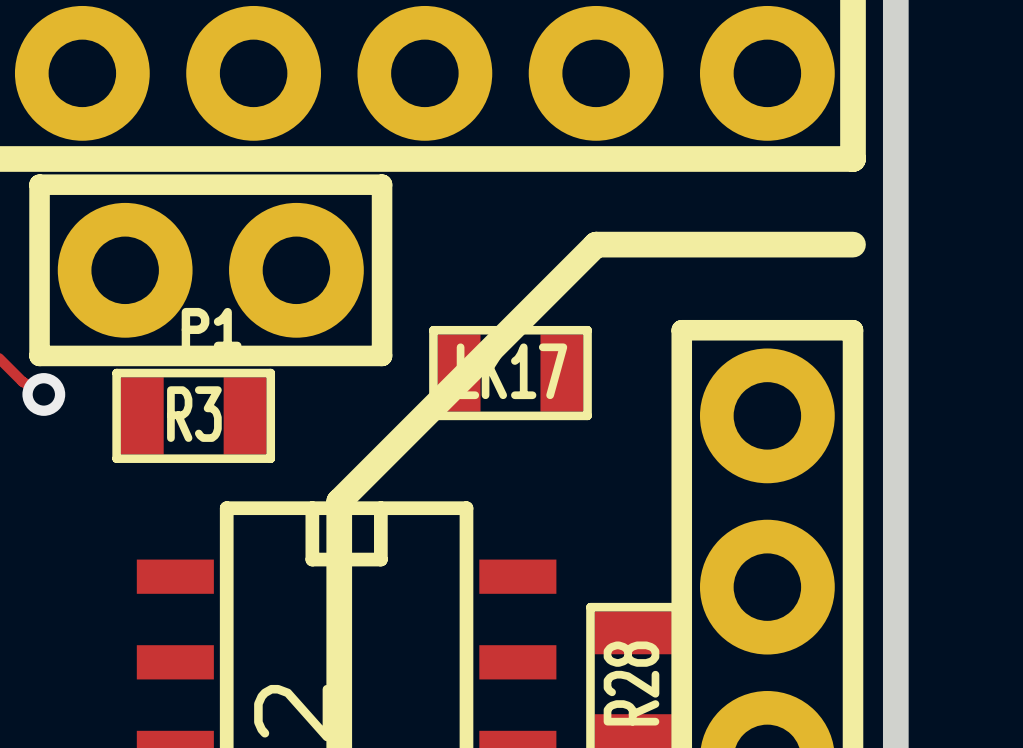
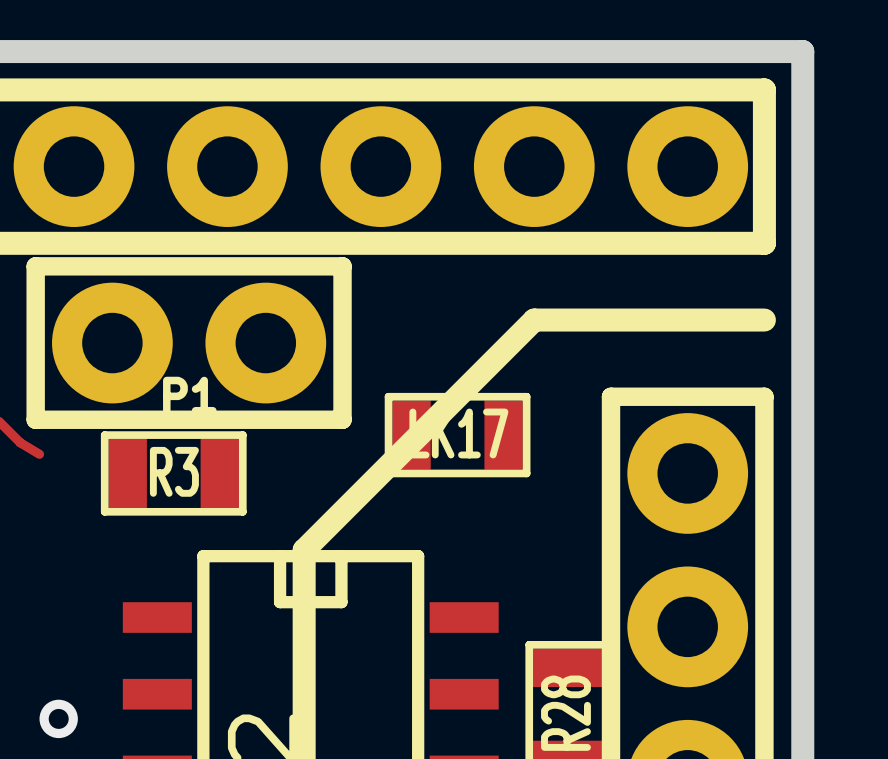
via position: (43, 394) -> (58, 718)

